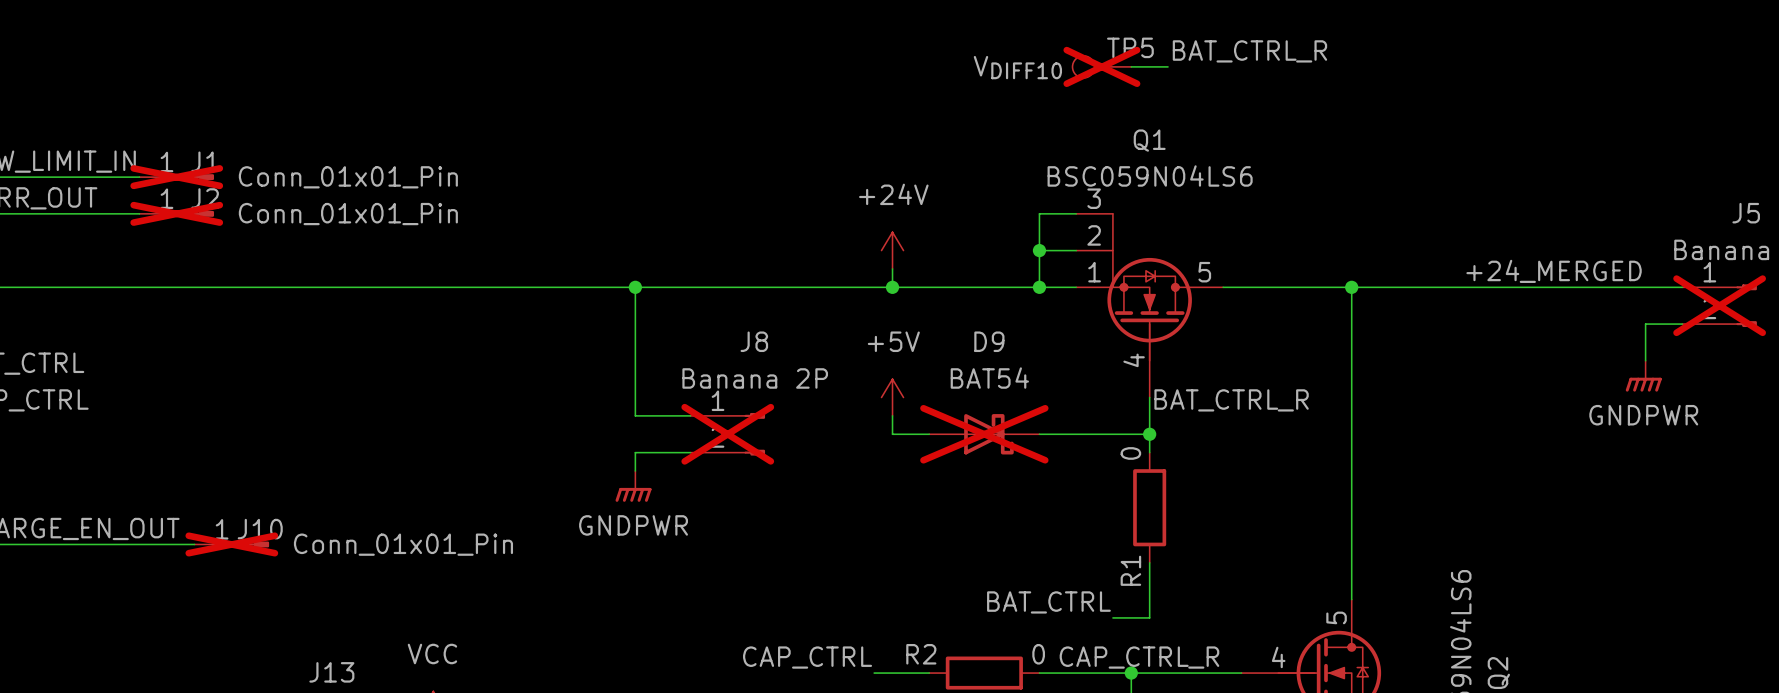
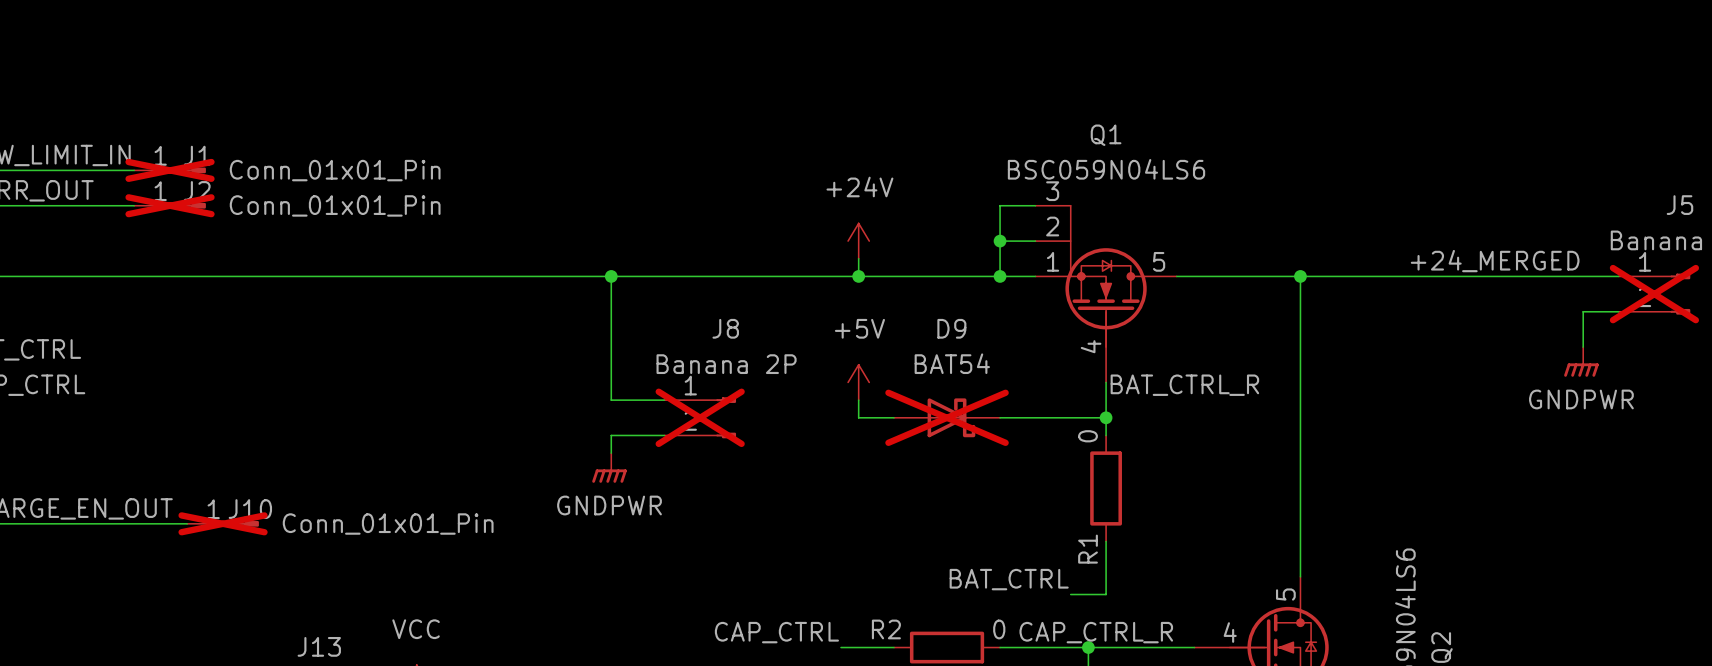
label: BAT_CTRL_R (1249, 51) -> none
TP5: VDIFF10 (1101, 66) -> none
wire: (1131, 66) (1168, 66) -> none

